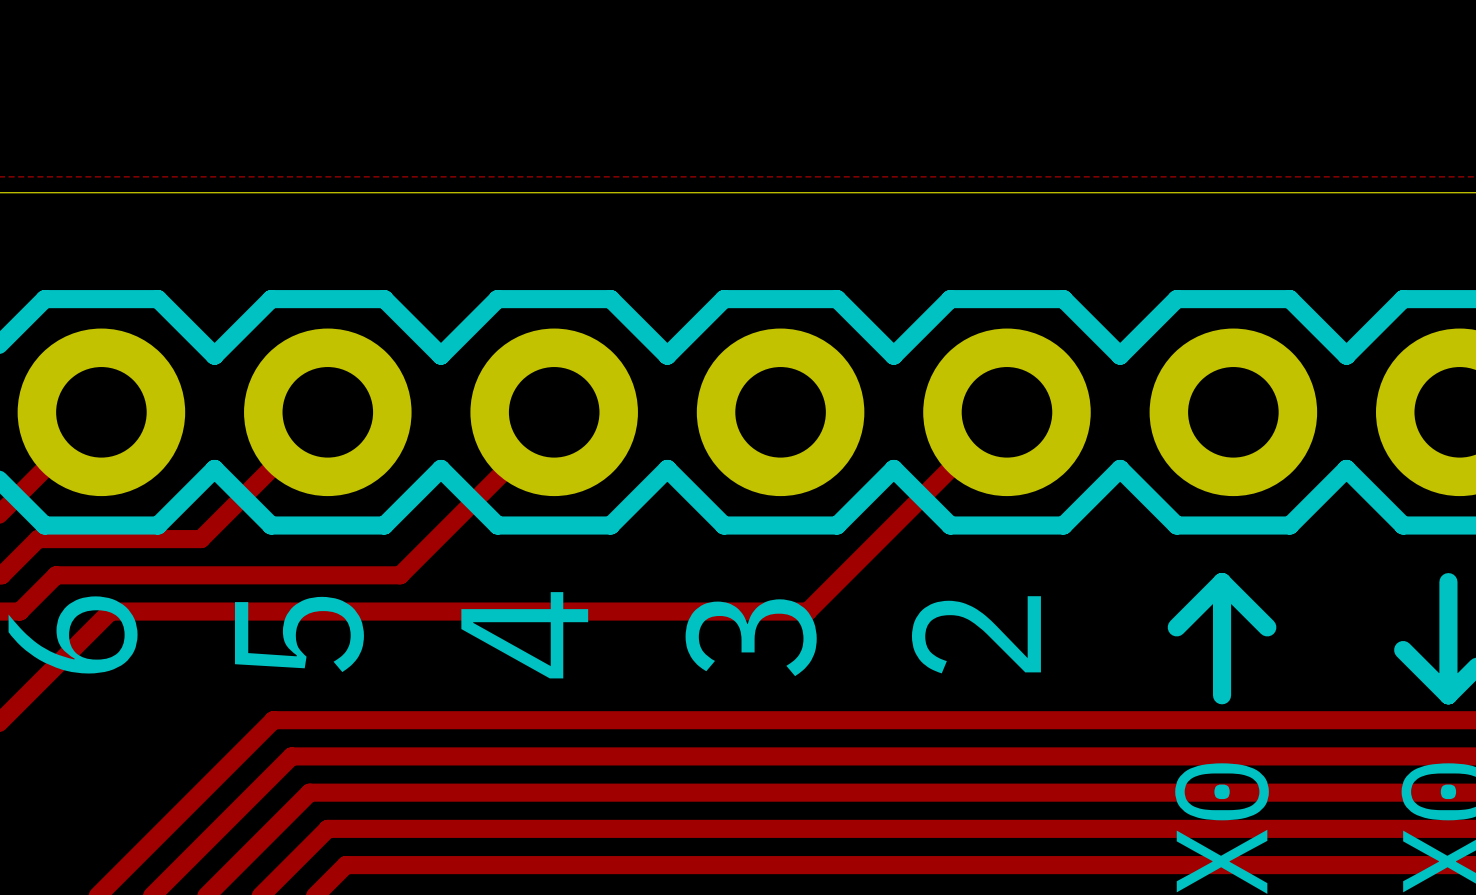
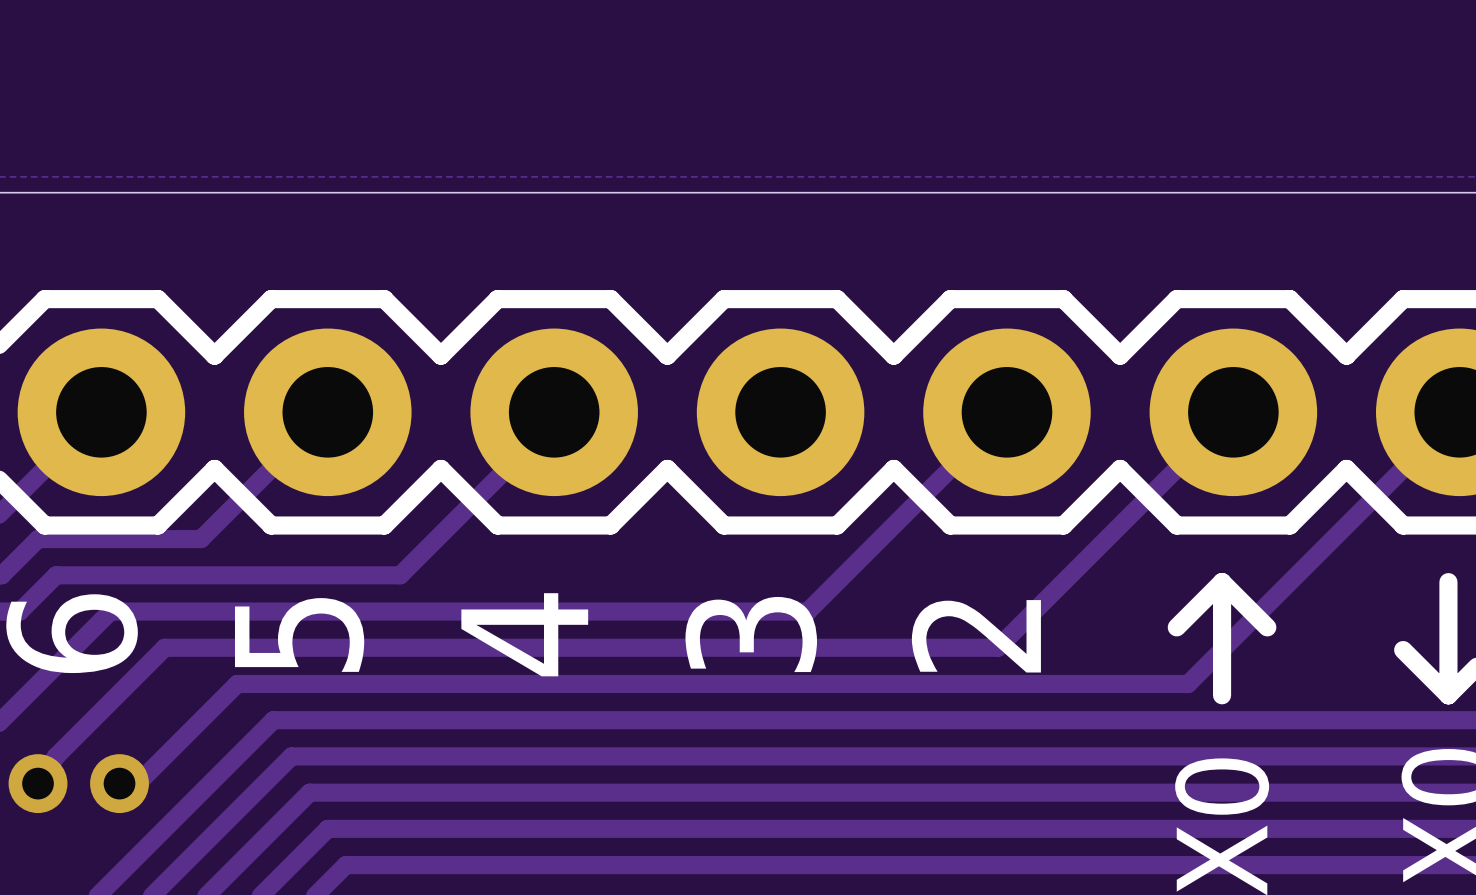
track: none -> (1233, 412) (997, 647) (164, 647) (56, 756) (38, 783)
track: none -> (1459, 412) (1188, 683) (237, 683) (137, 783) (119, 783)
via: none -> (38, 783)
via: none -> (119, 783)

